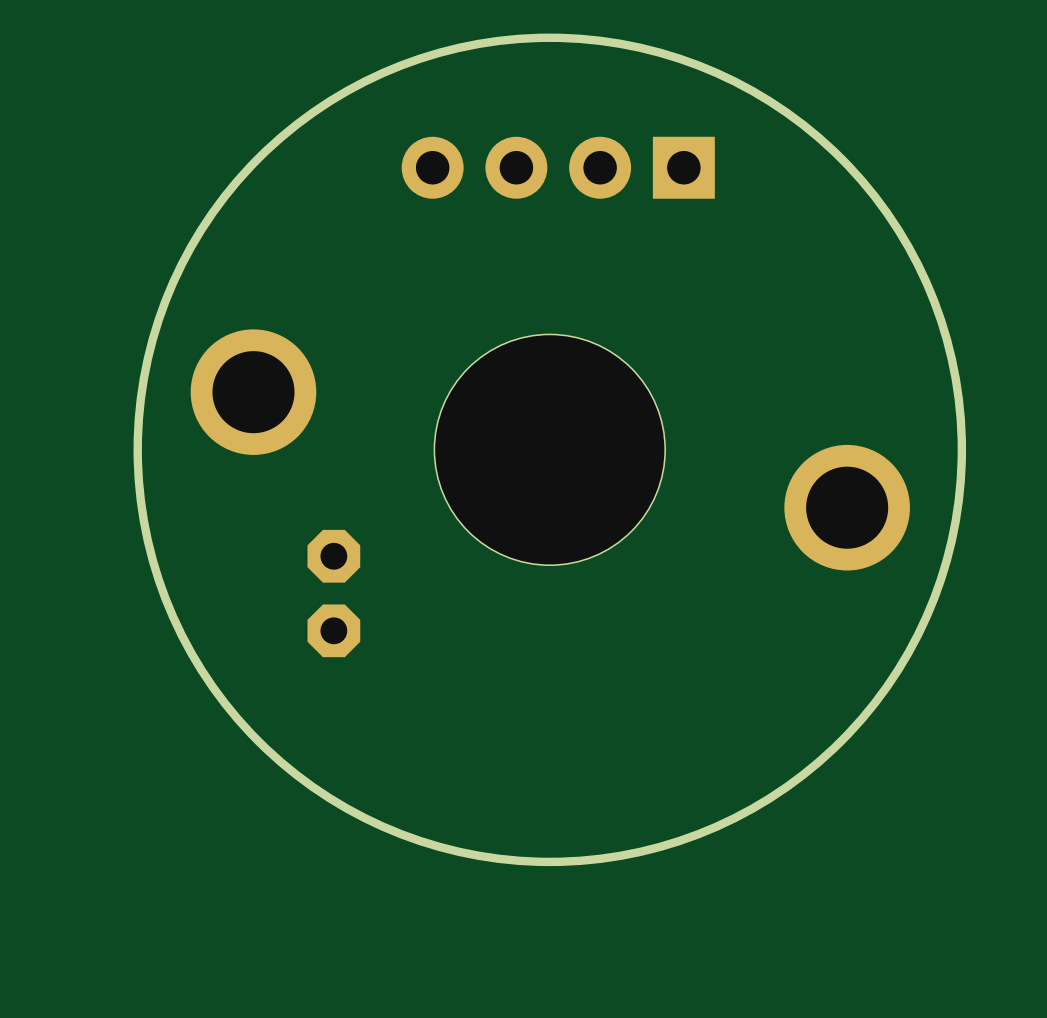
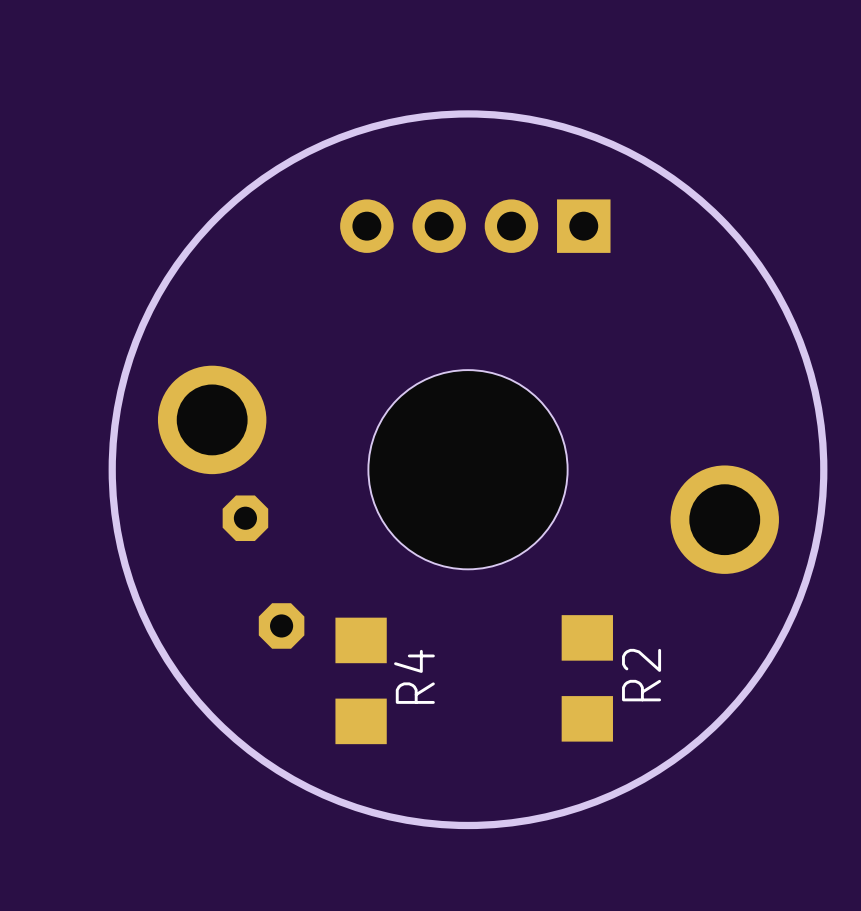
part position: (333, 556) -> (245, 518)
R2: none -> (587, 678)
R4: none -> (361, 680)

